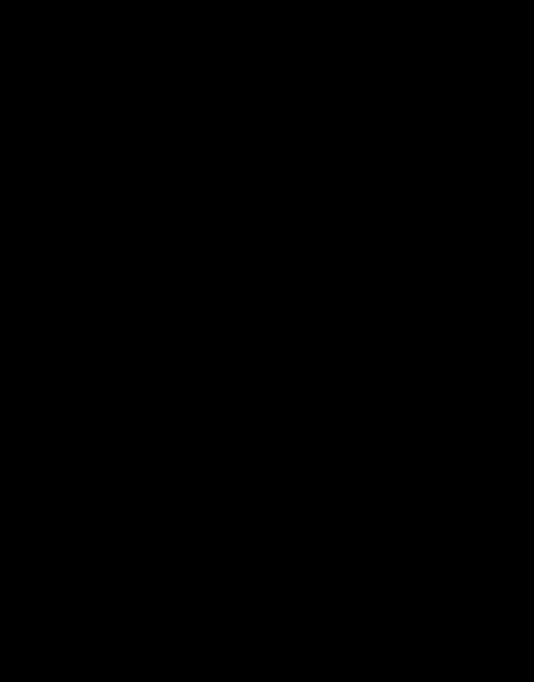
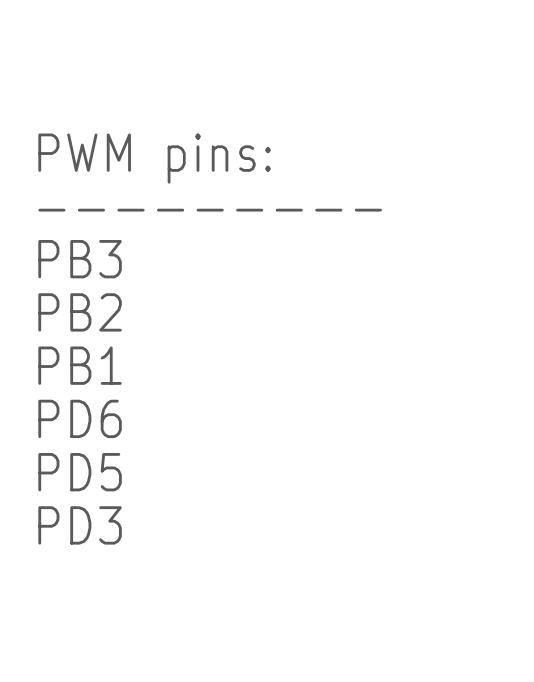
text: none -> PWM pins: (154, 158)
text: none -> --------- (210, 210)
text: none -> PB3 (80, 259)
text: none -> PB2 (80, 312)
text: none -> PB1 (80, 365)
text: none -> PD6 (80, 418)
text: none -> PD5 (80, 472)
text: none -> PD3 (80, 525)

